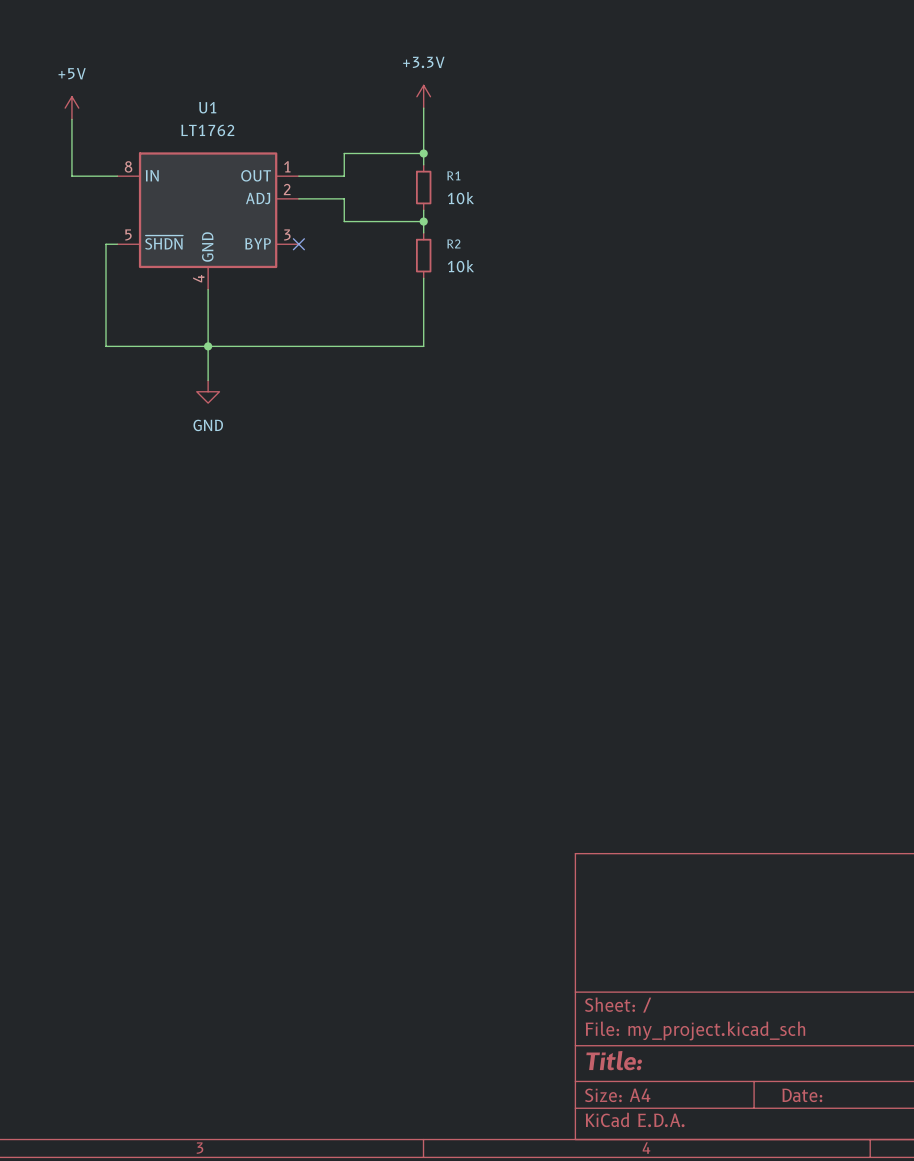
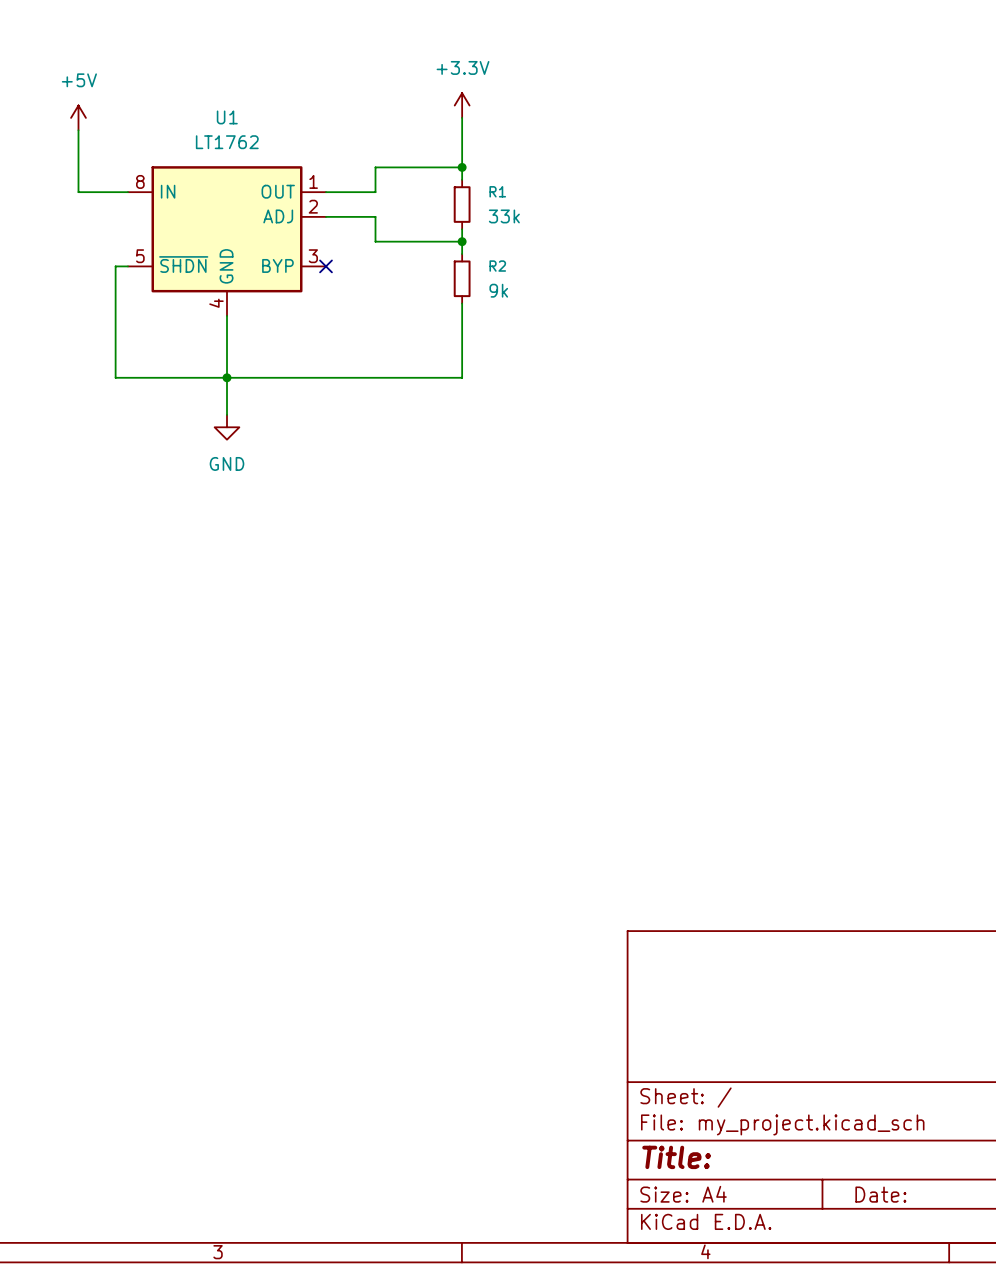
R1 value: 10k (460, 198) -> 33k (504, 216)
R2 value: 10k (460, 266) -> 9k (498, 290)

